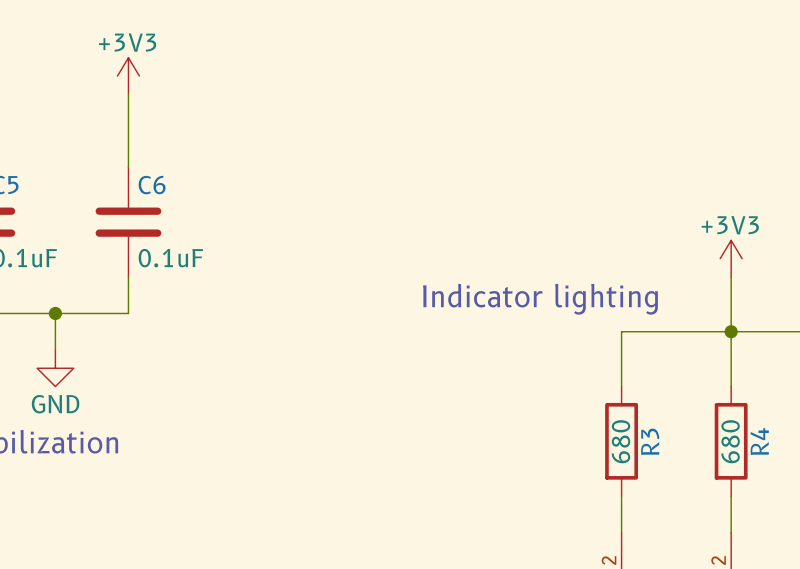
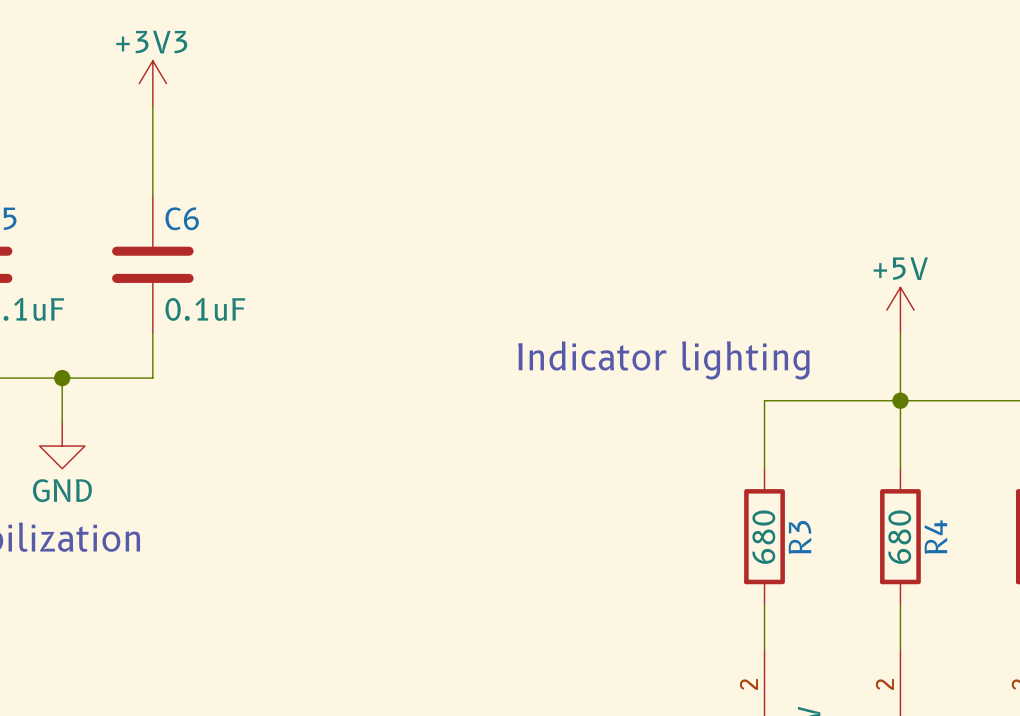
power symbol: +3V3 (731, 258) -> +5V (900, 310)

